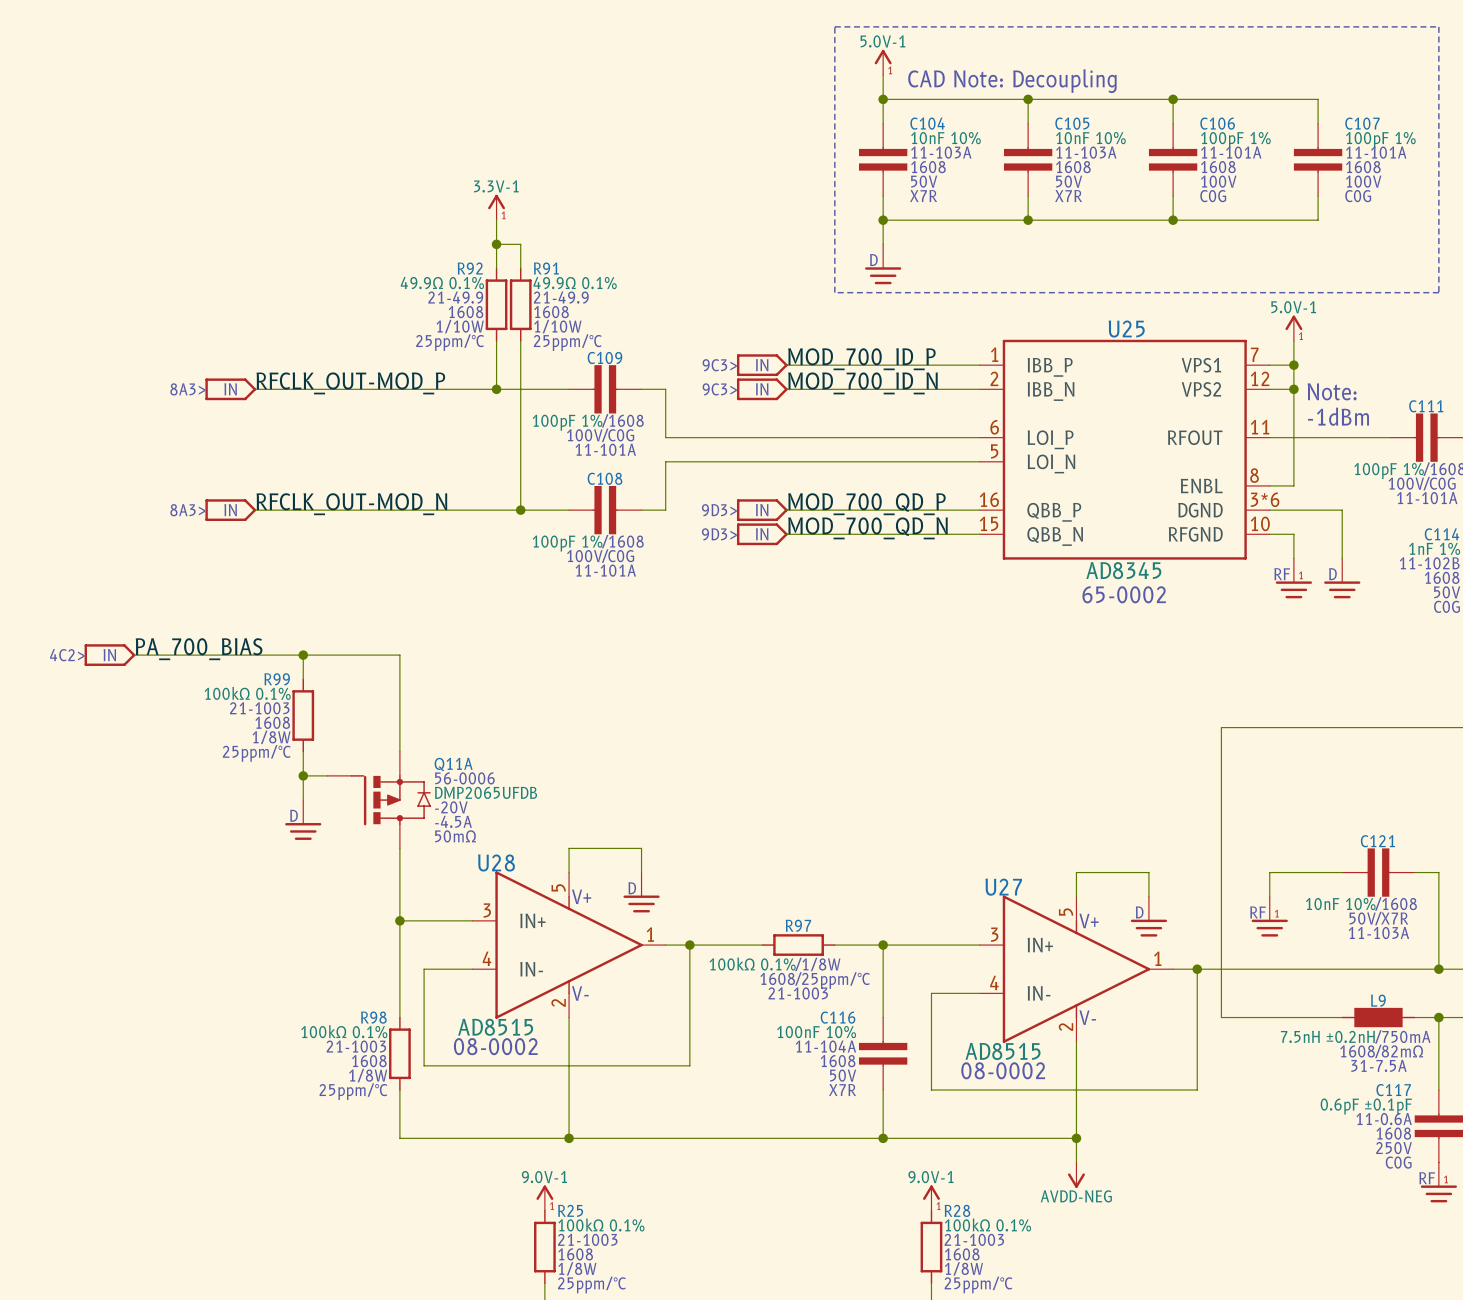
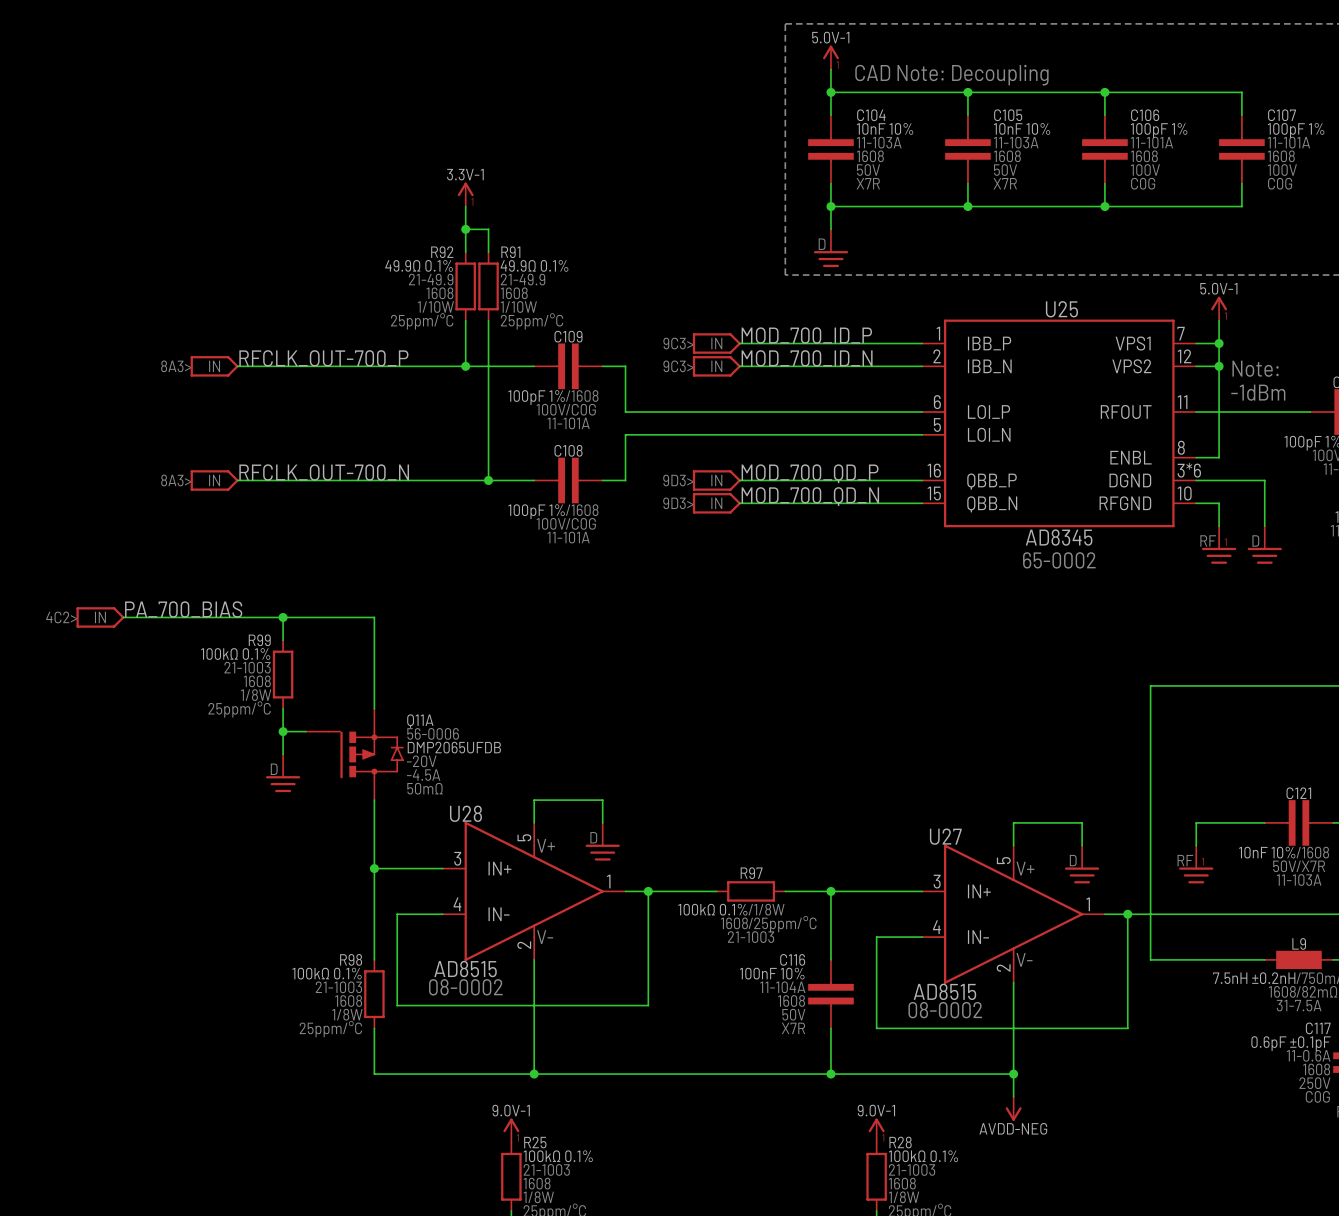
label: RFCLK_OUT-MOD_P (350, 383) -> RFCLK_OUT-700_P (323, 358)
label: RFCLK_OUT-MOD_N (351, 504) -> RFCLK_OUT-700_N (324, 472)

